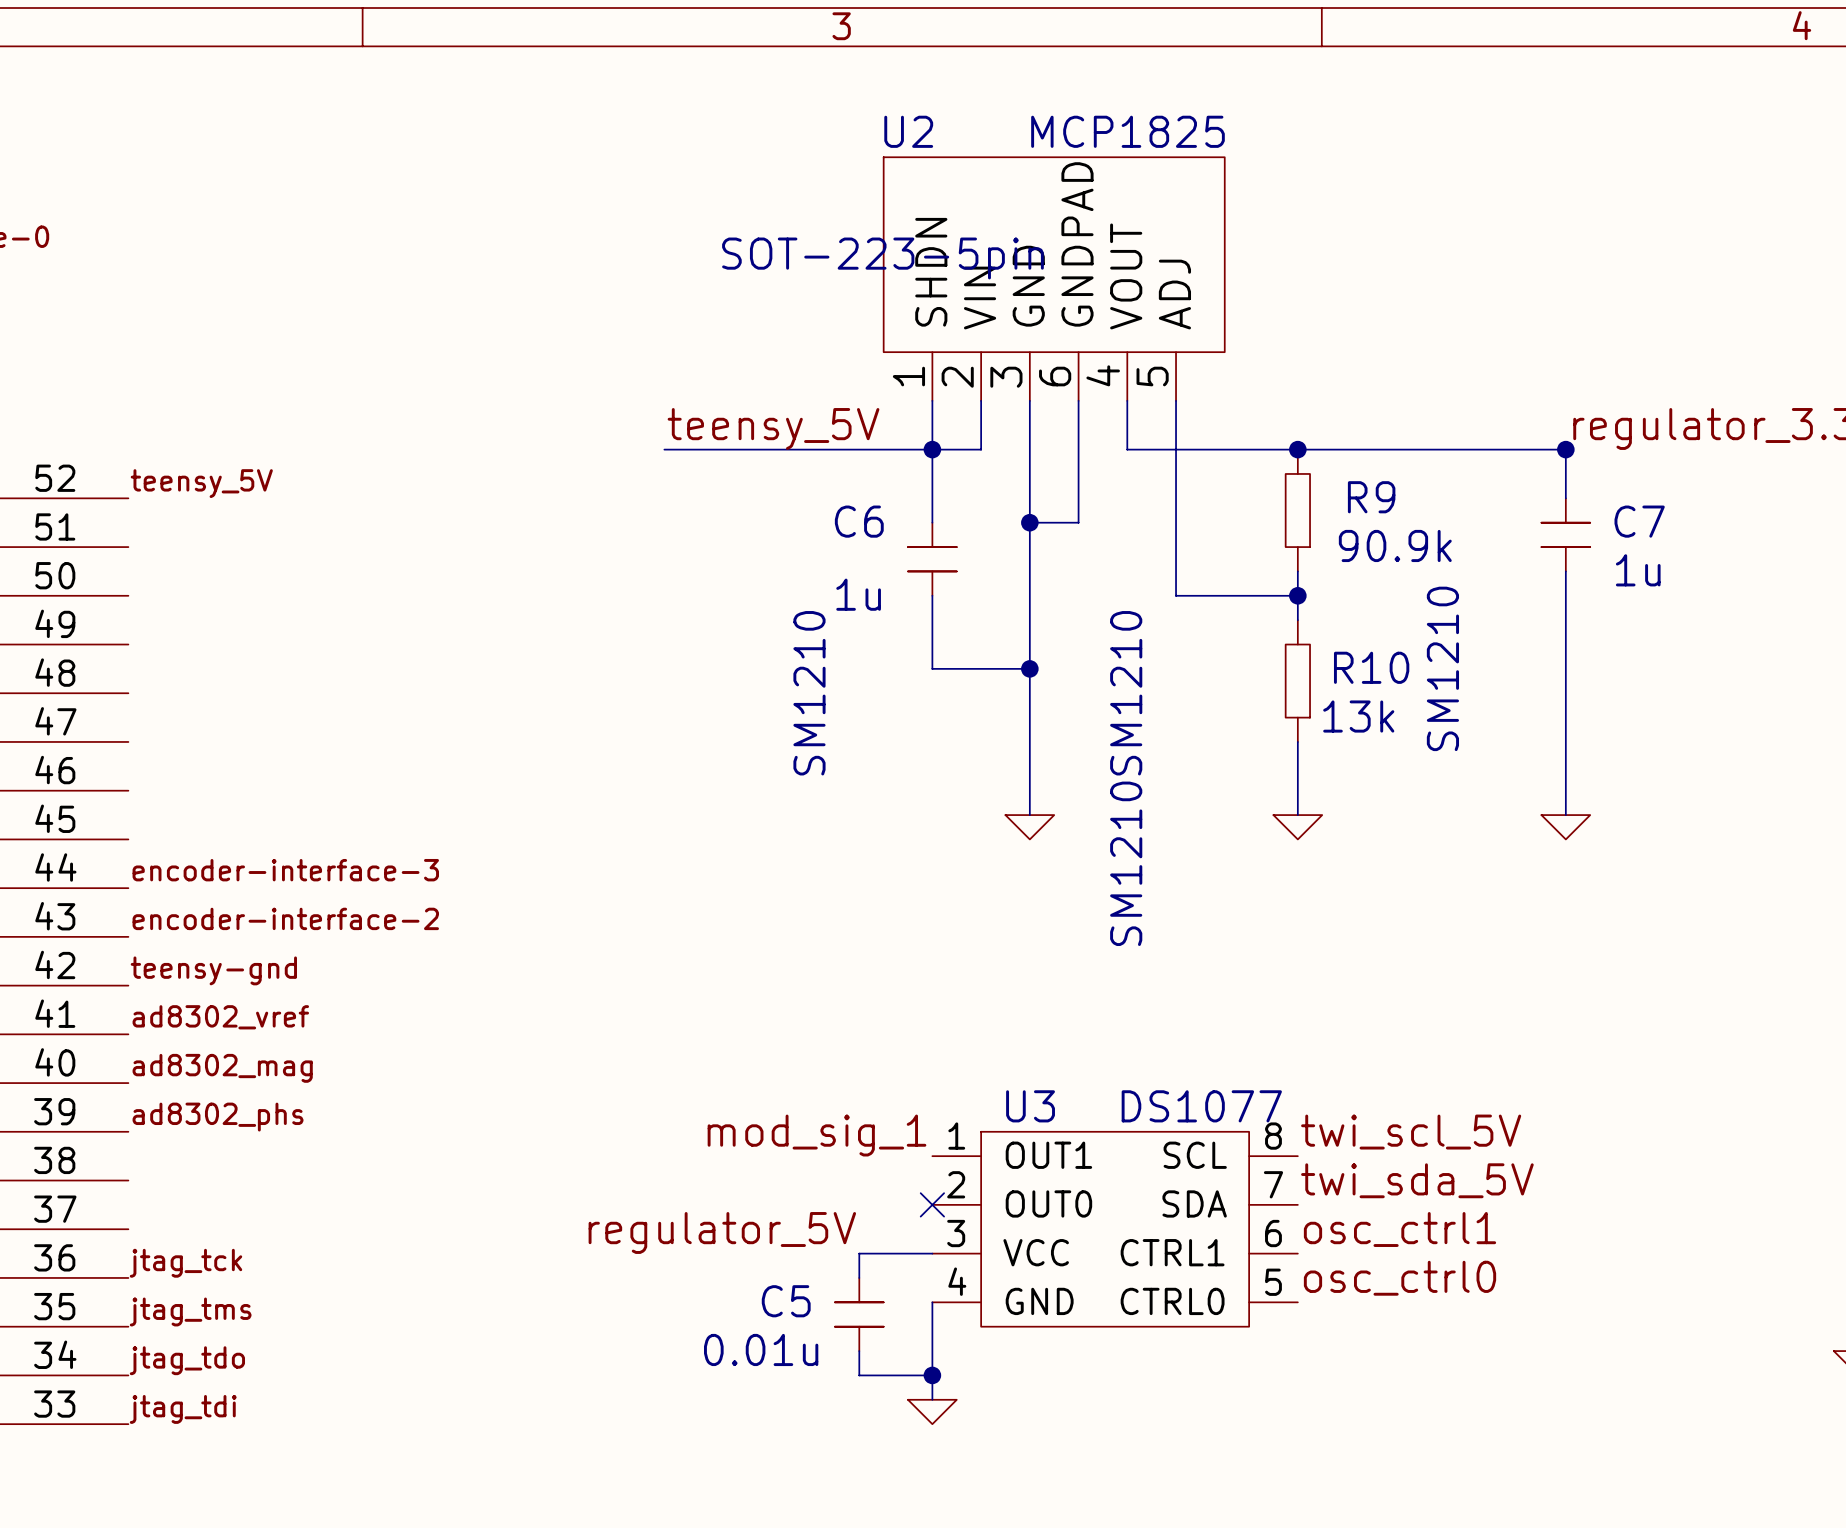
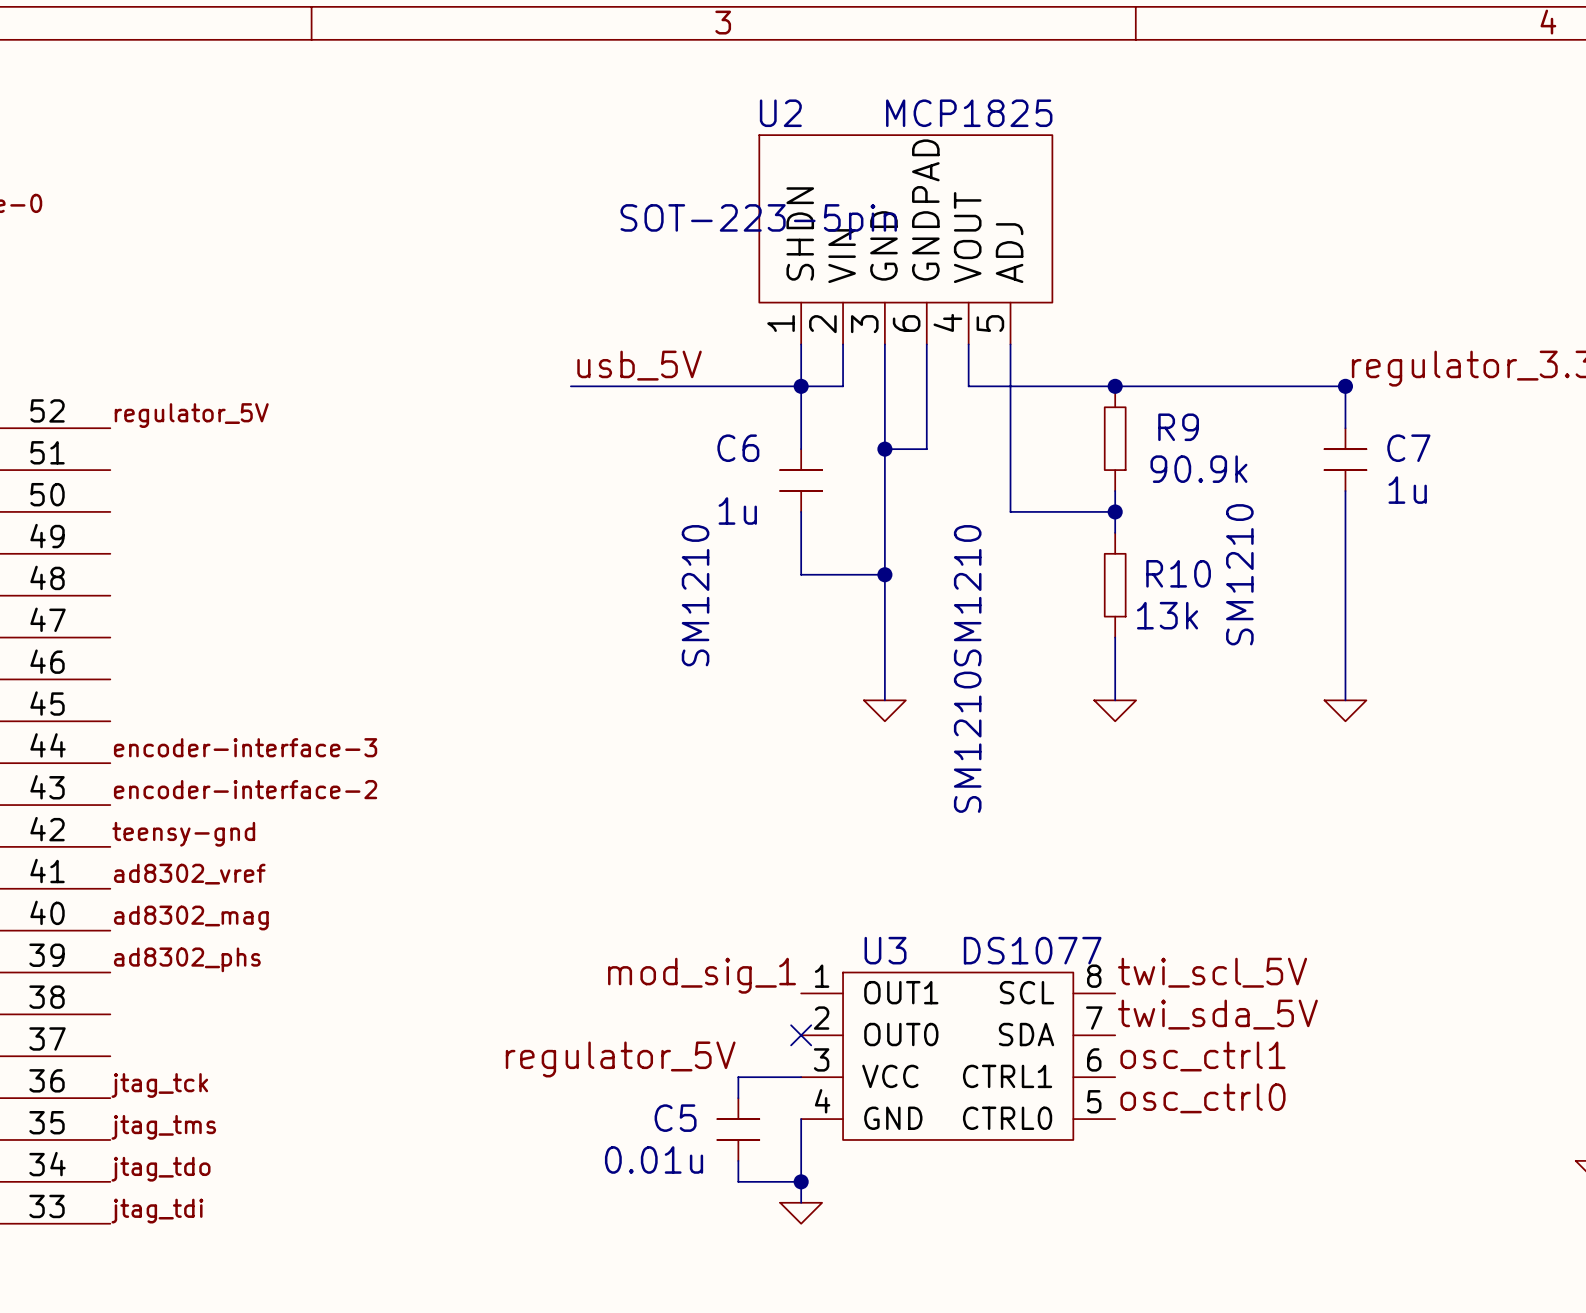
label: teensy_5V (773, 428) -> usb_5V (639, 365)
label: teensy_5V (201, 483) -> regulator_5V (191, 415)

